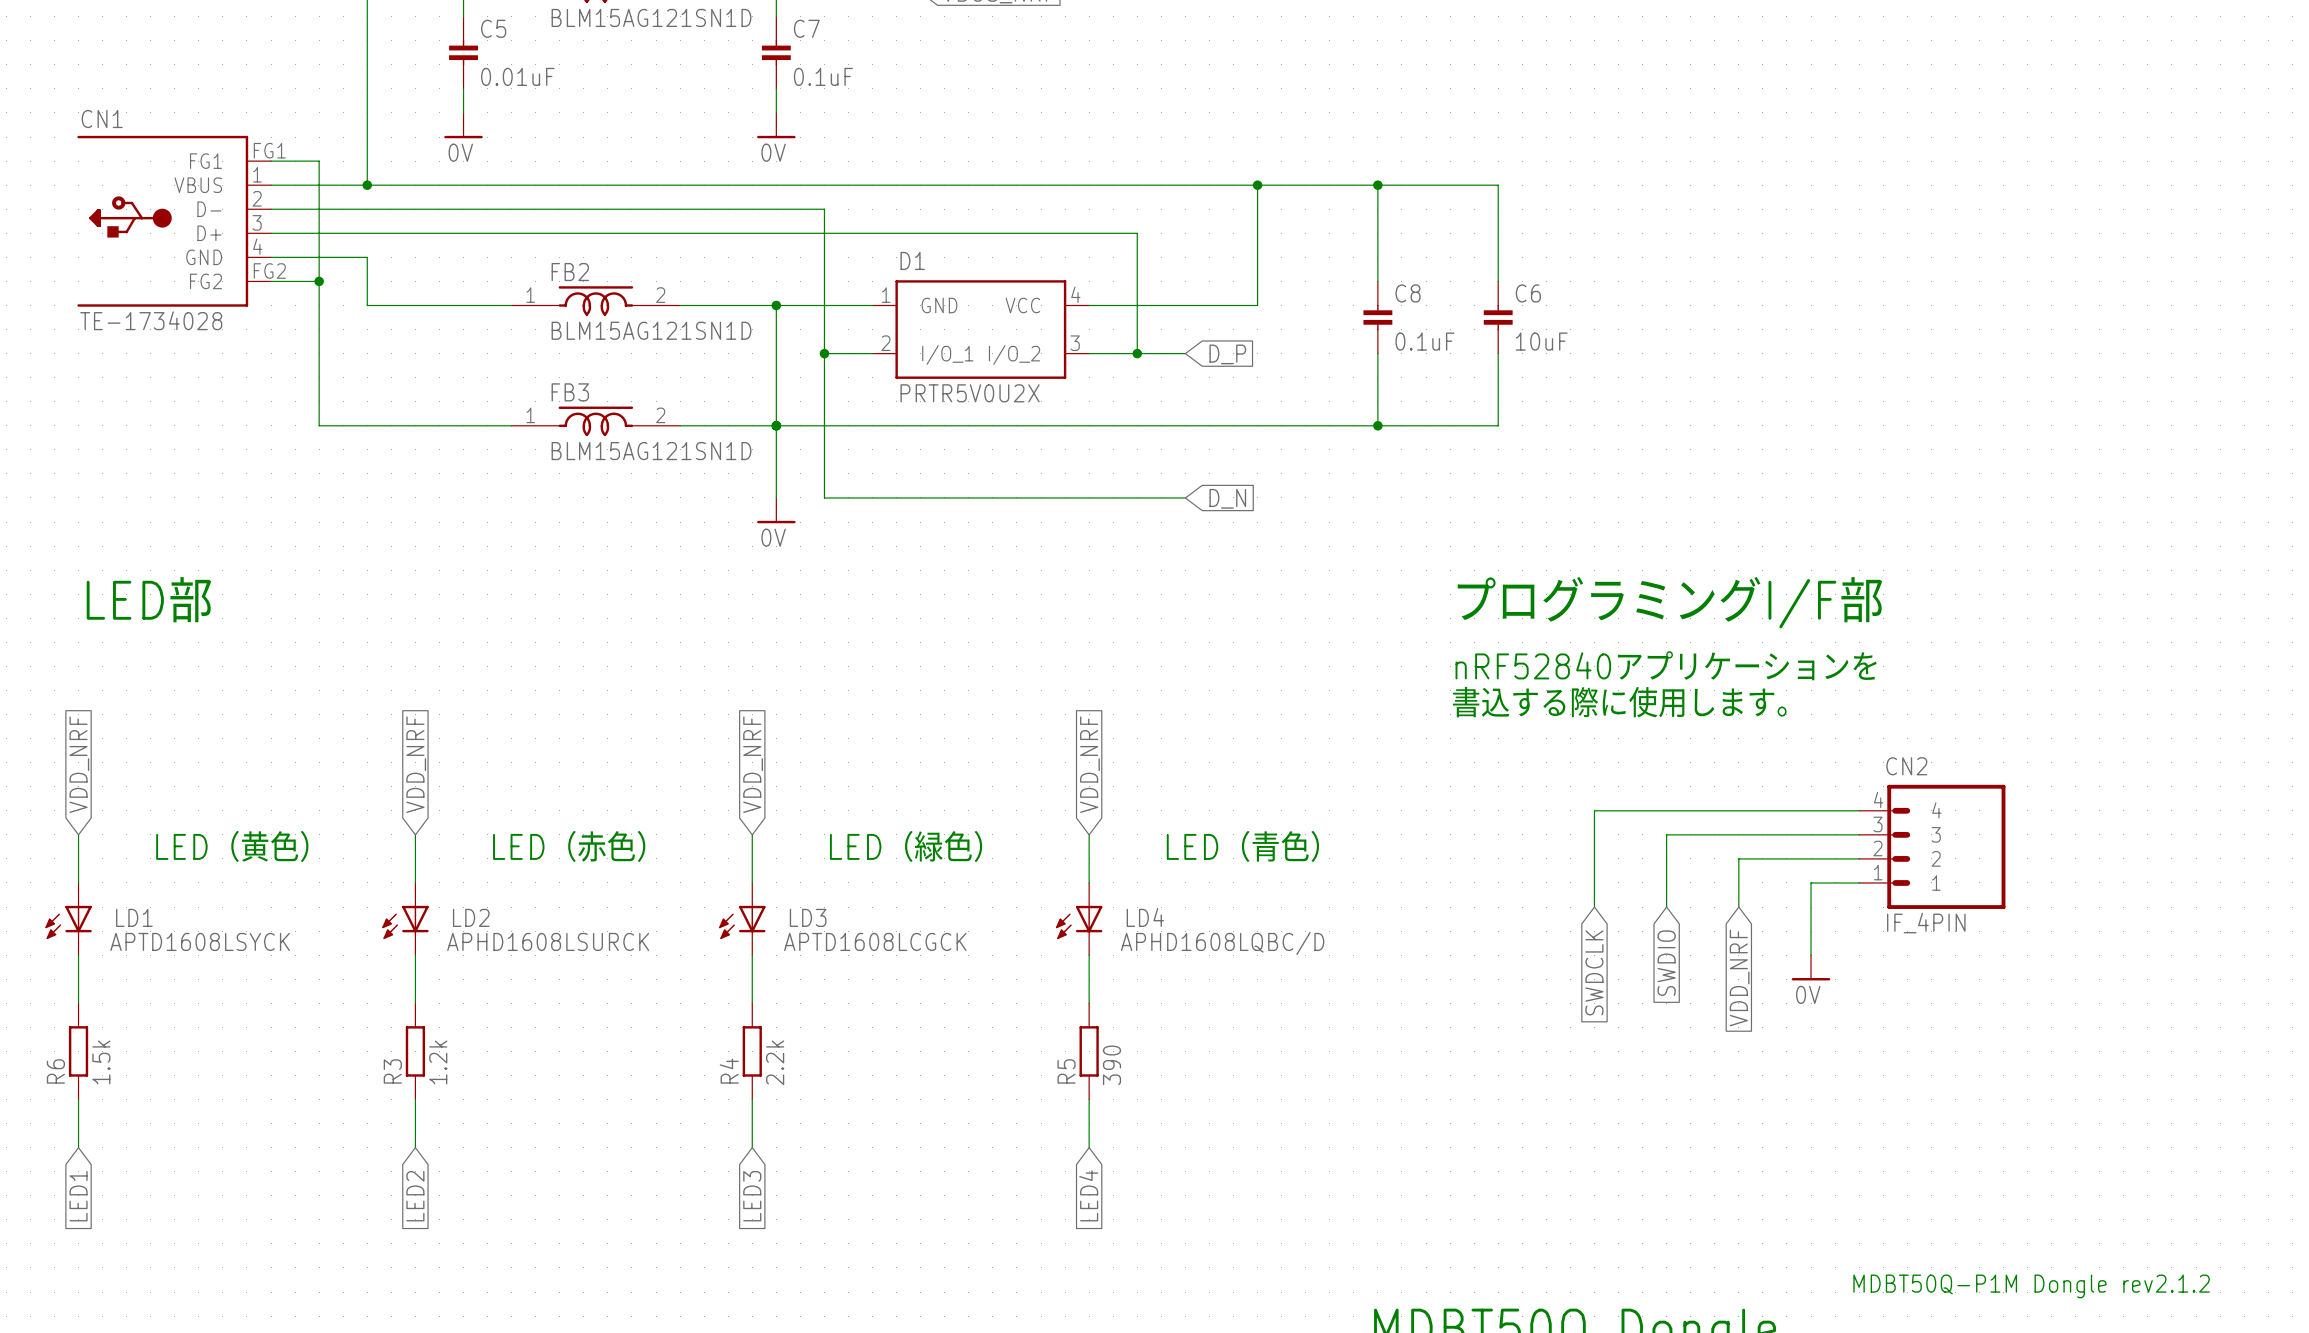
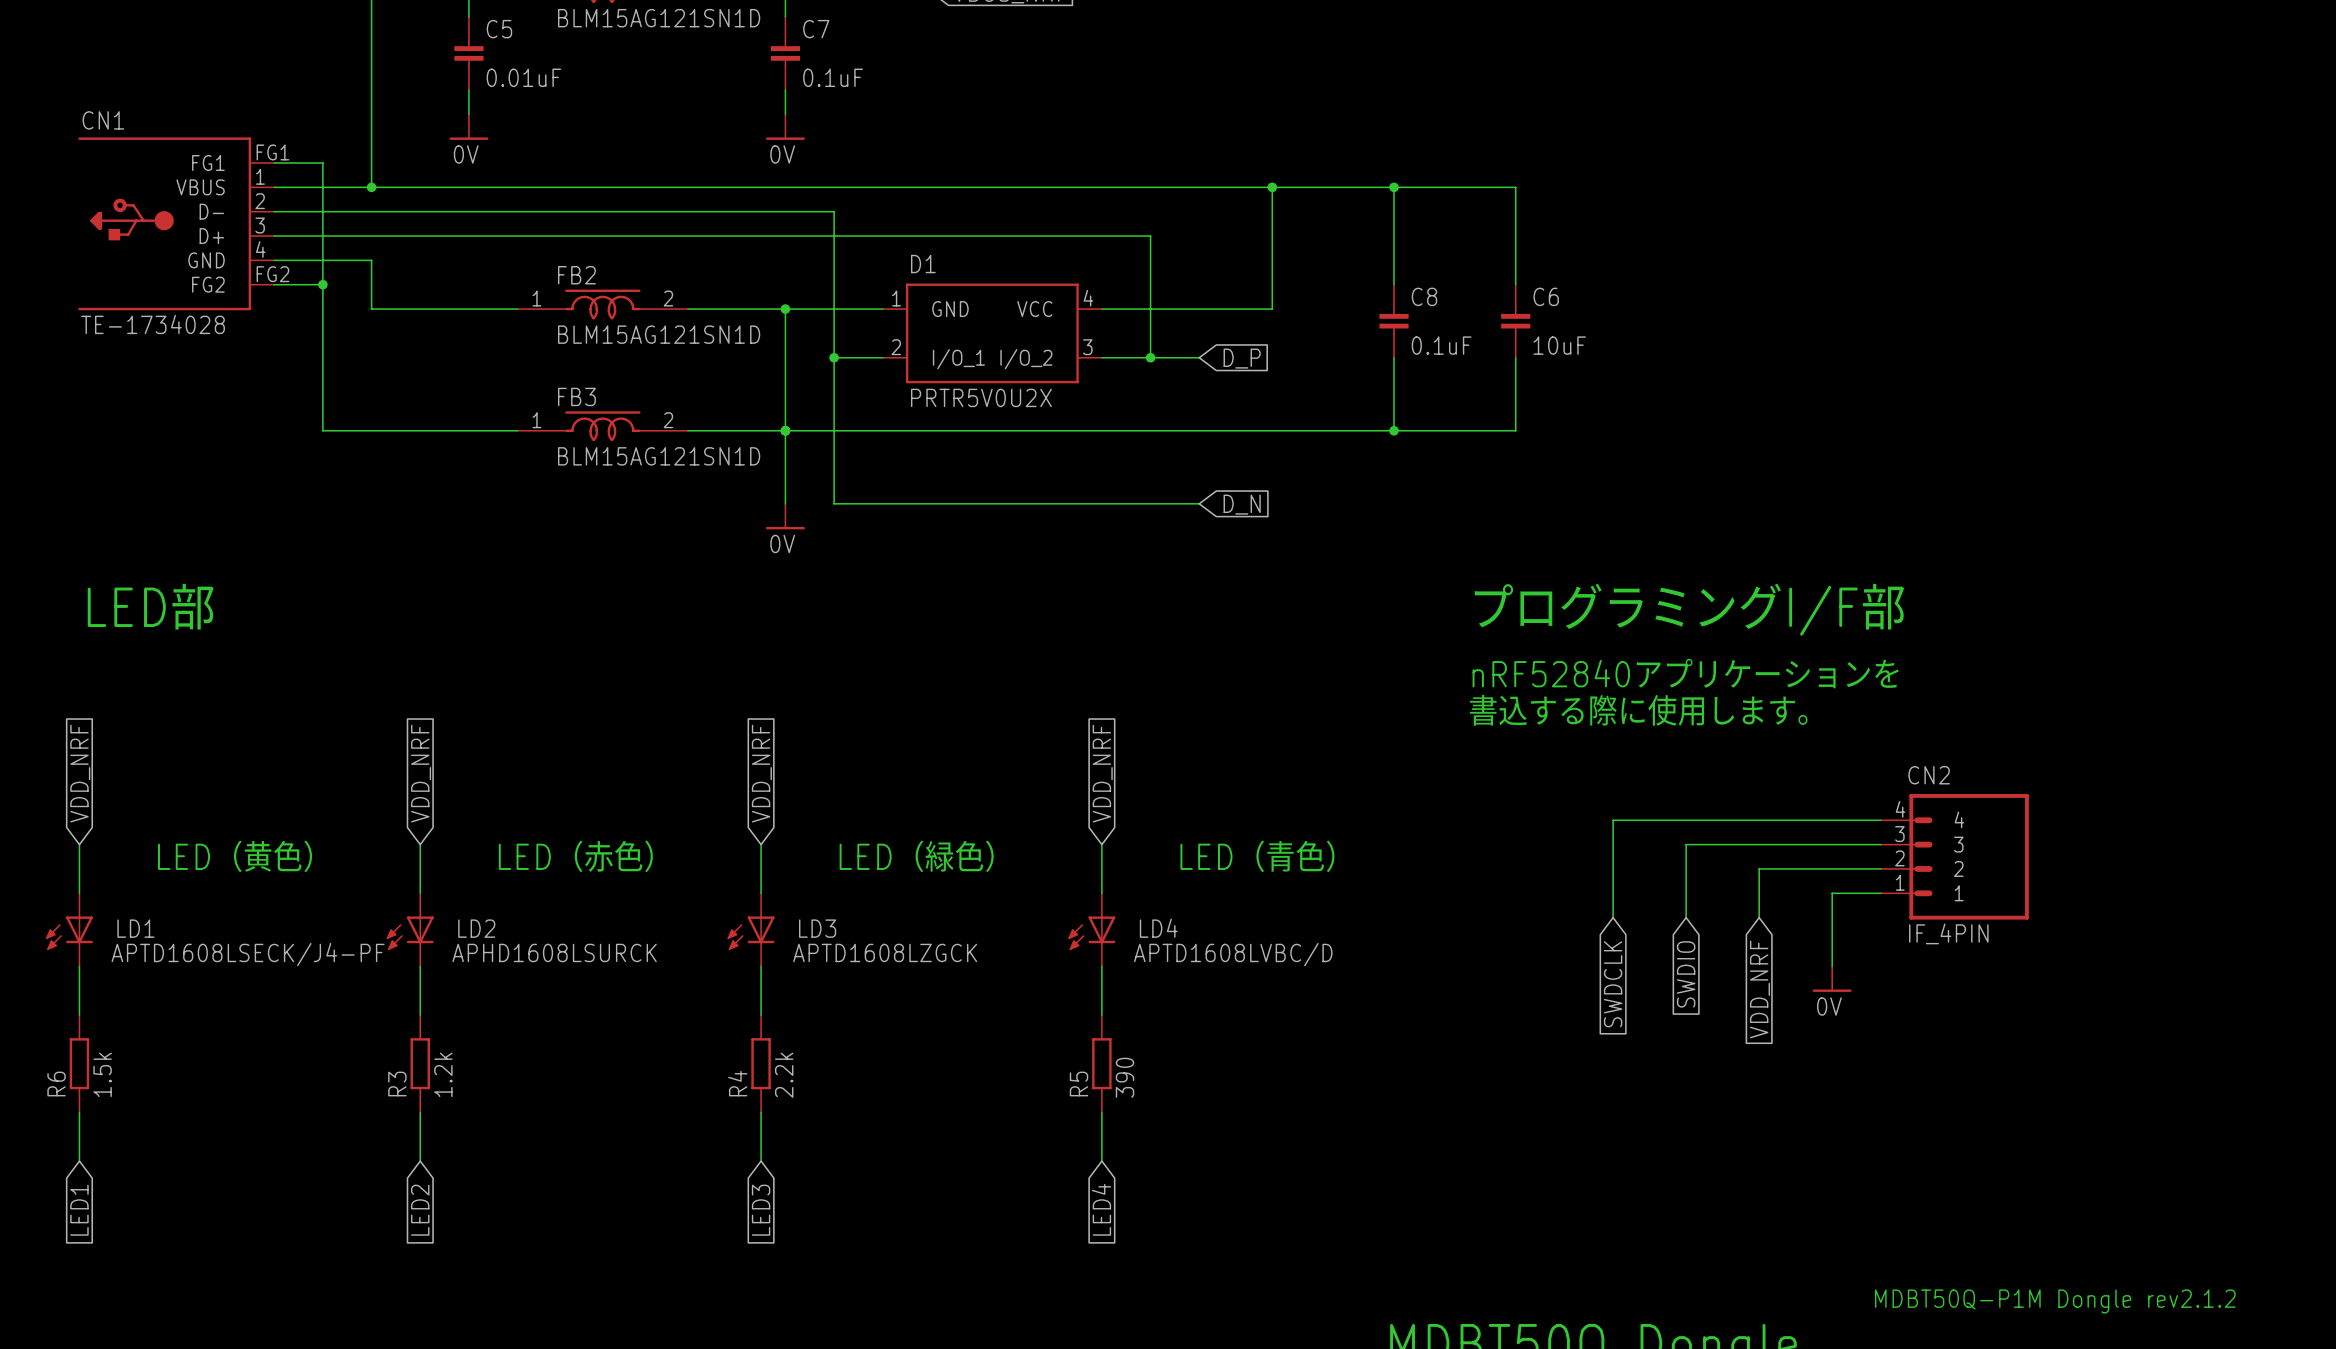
LD1 value: APTD1608LSYCK (200, 941) -> APTD1608LSECK/J4-PF (248, 954)
LD3 value: APTD1608LCGCK (875, 941) -> APTD1608LZGCK (885, 952)
LD4 value: APHD1608LQBC/D (1222, 943) -> APTD1608LVBC/D (1233, 954)

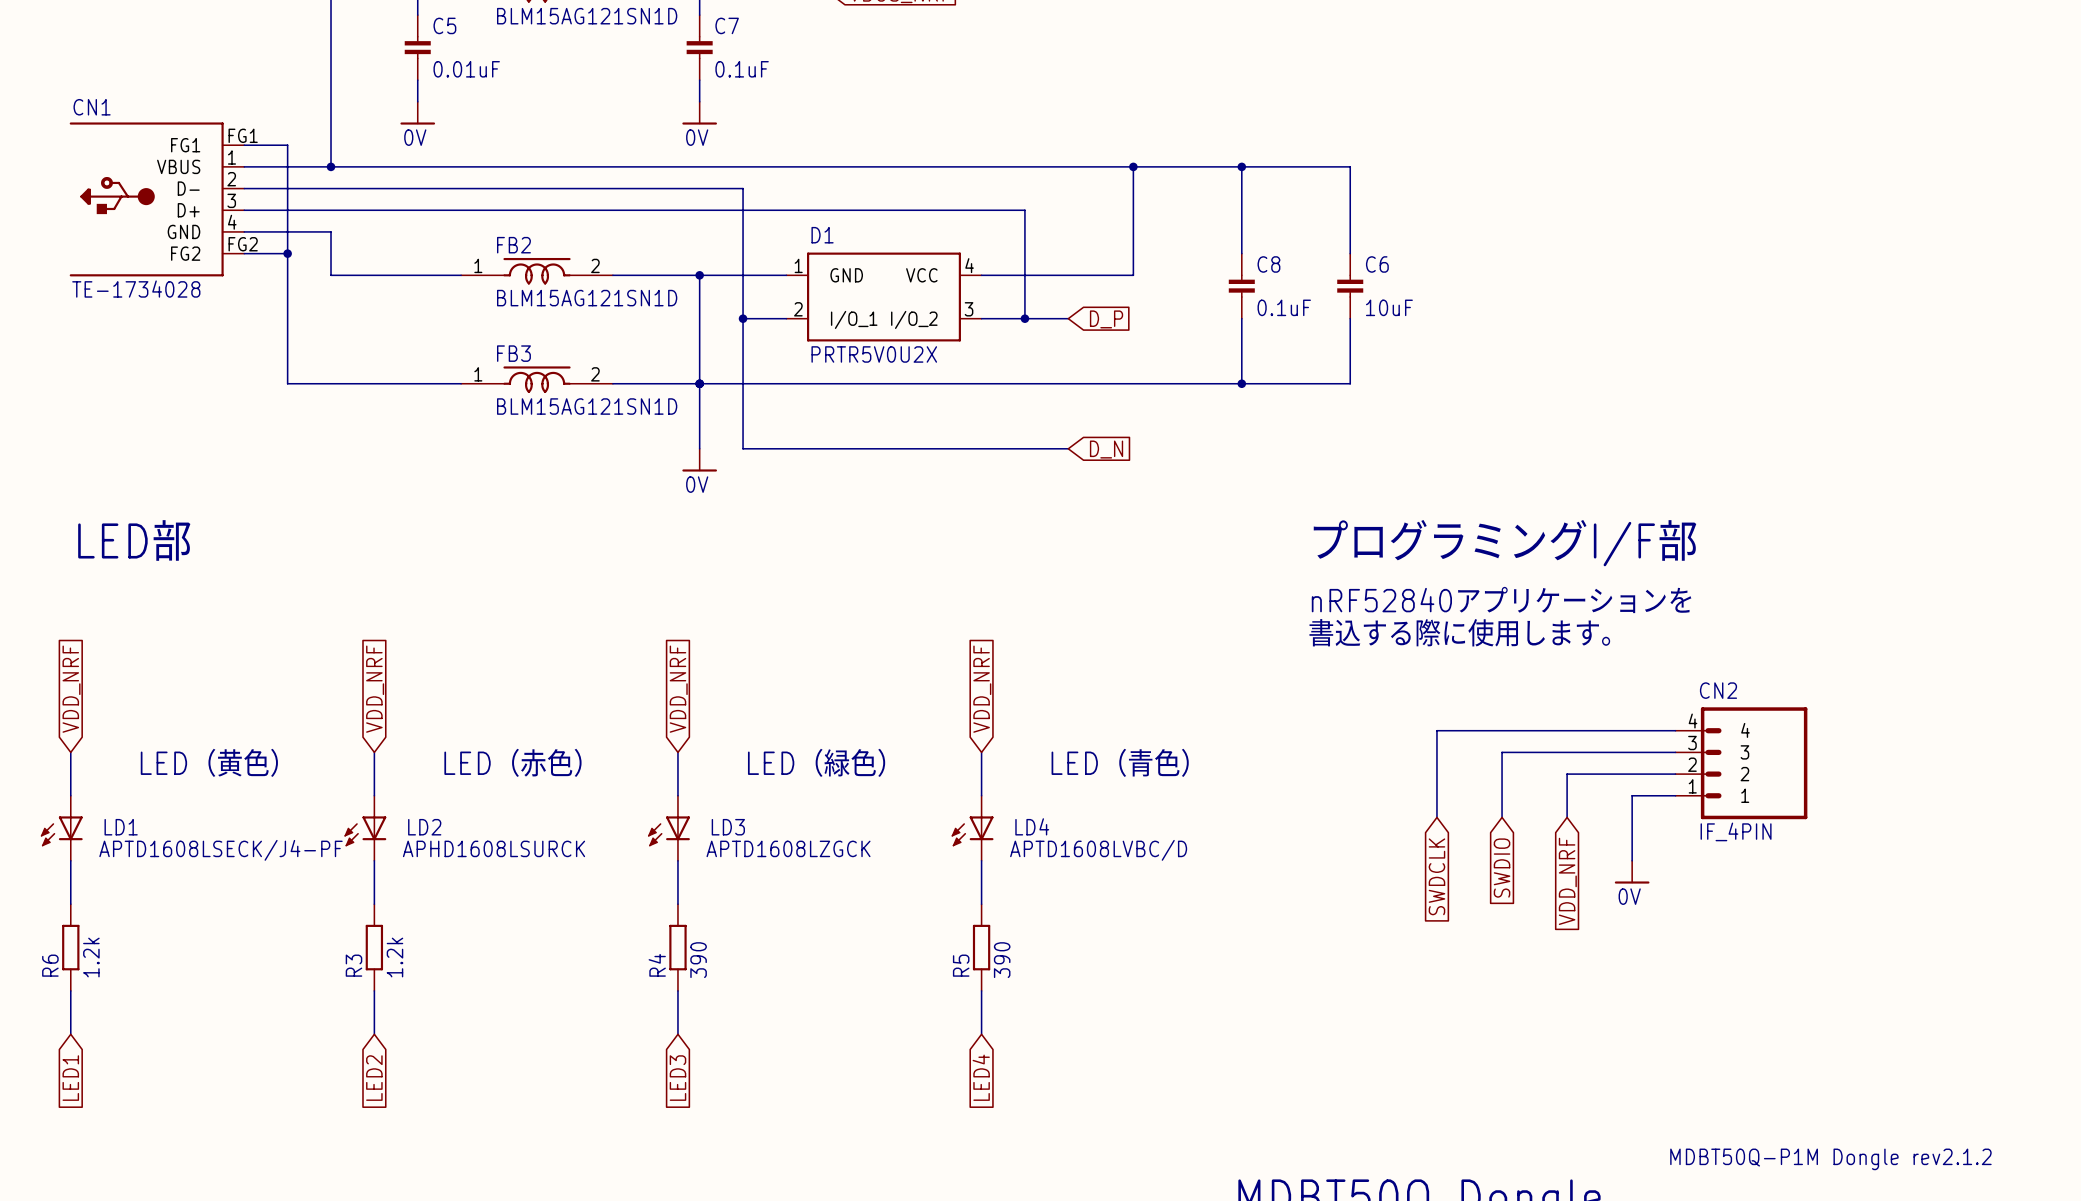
R6 value: 1.5k (102, 1074) -> 1.2k (91, 957)
R4 value: 2.2k (784, 1075) -> 390 (698, 960)

